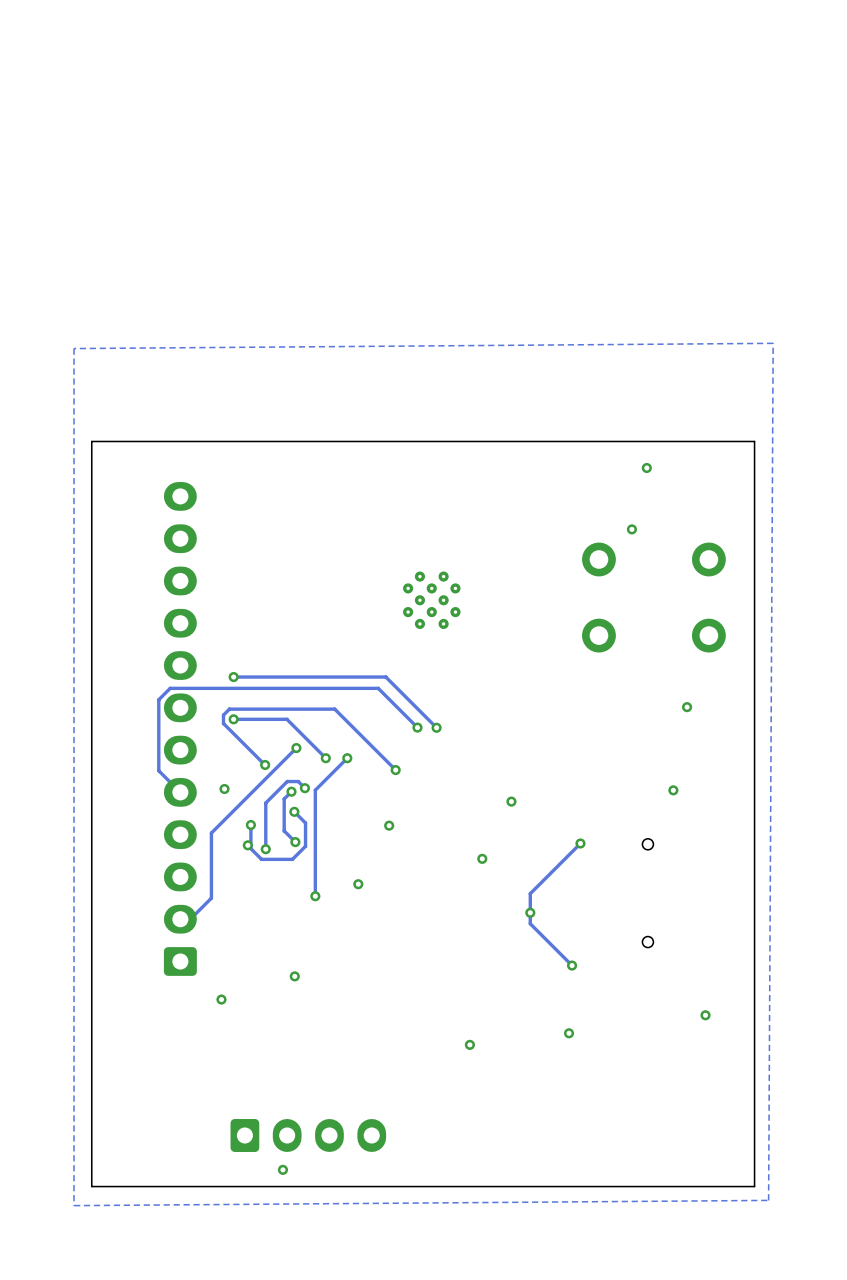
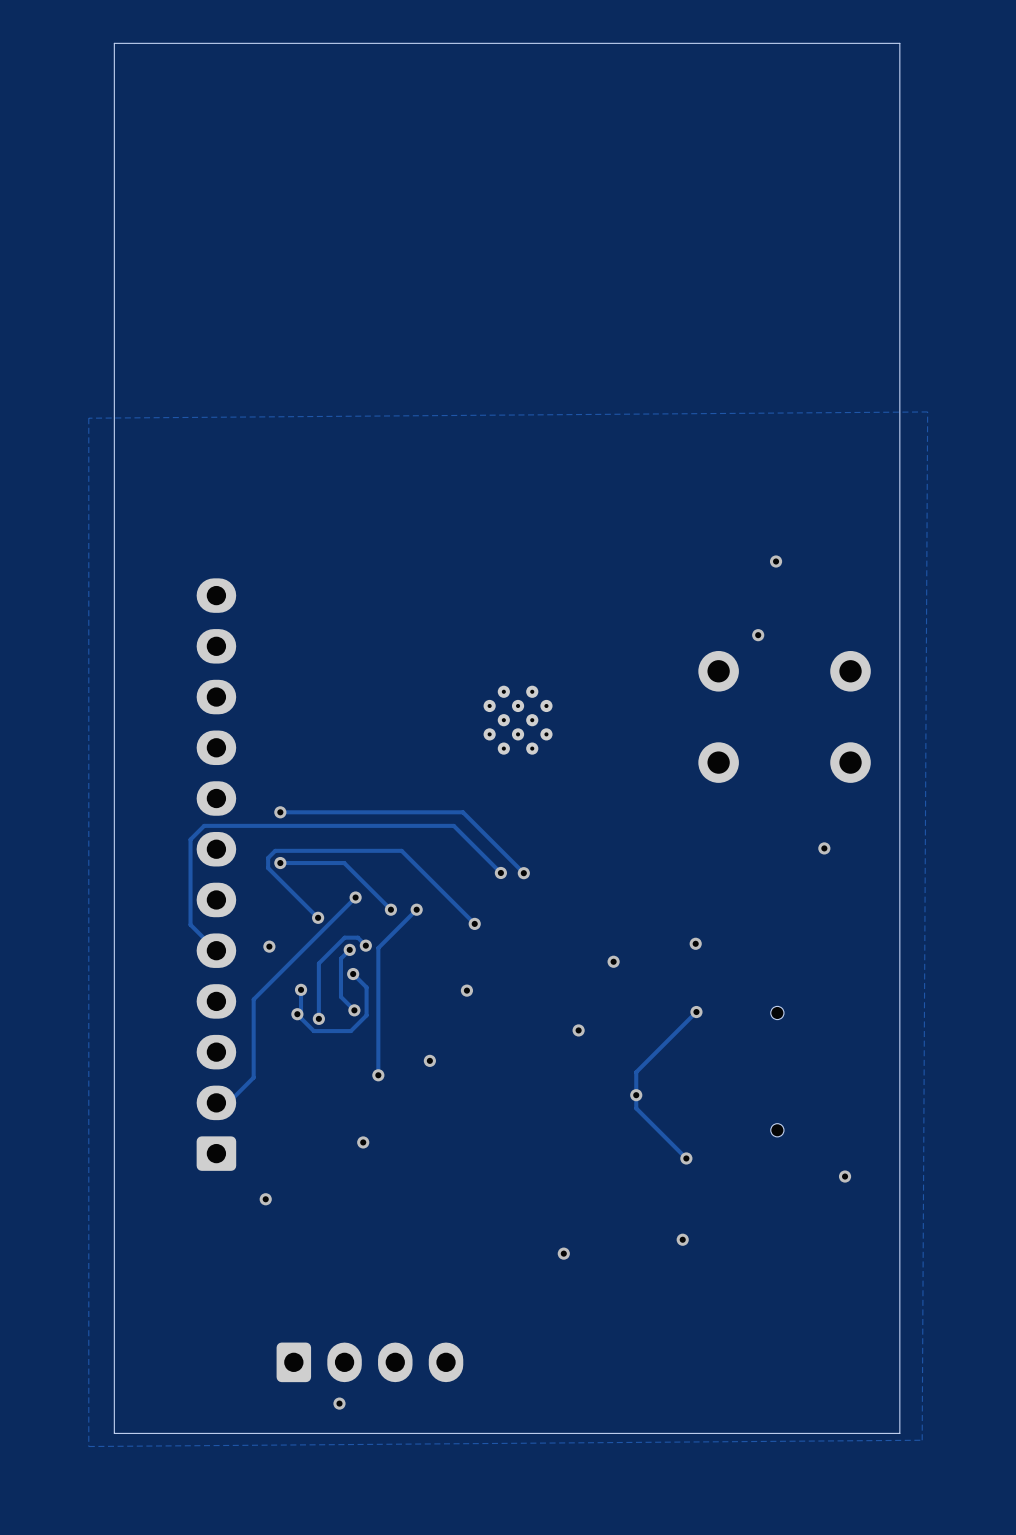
board edge: (754, 441) (91, 441) (91, 1186) (754, 1186) (754, 441) -> (899, 43) (899, 1433) (114, 1433) (114, 43) (899, 43)
via position: (673, 790) -> (695, 943)
via position: (294, 976) -> (363, 1142)
via position: (705, 1015) -> (845, 1176)

